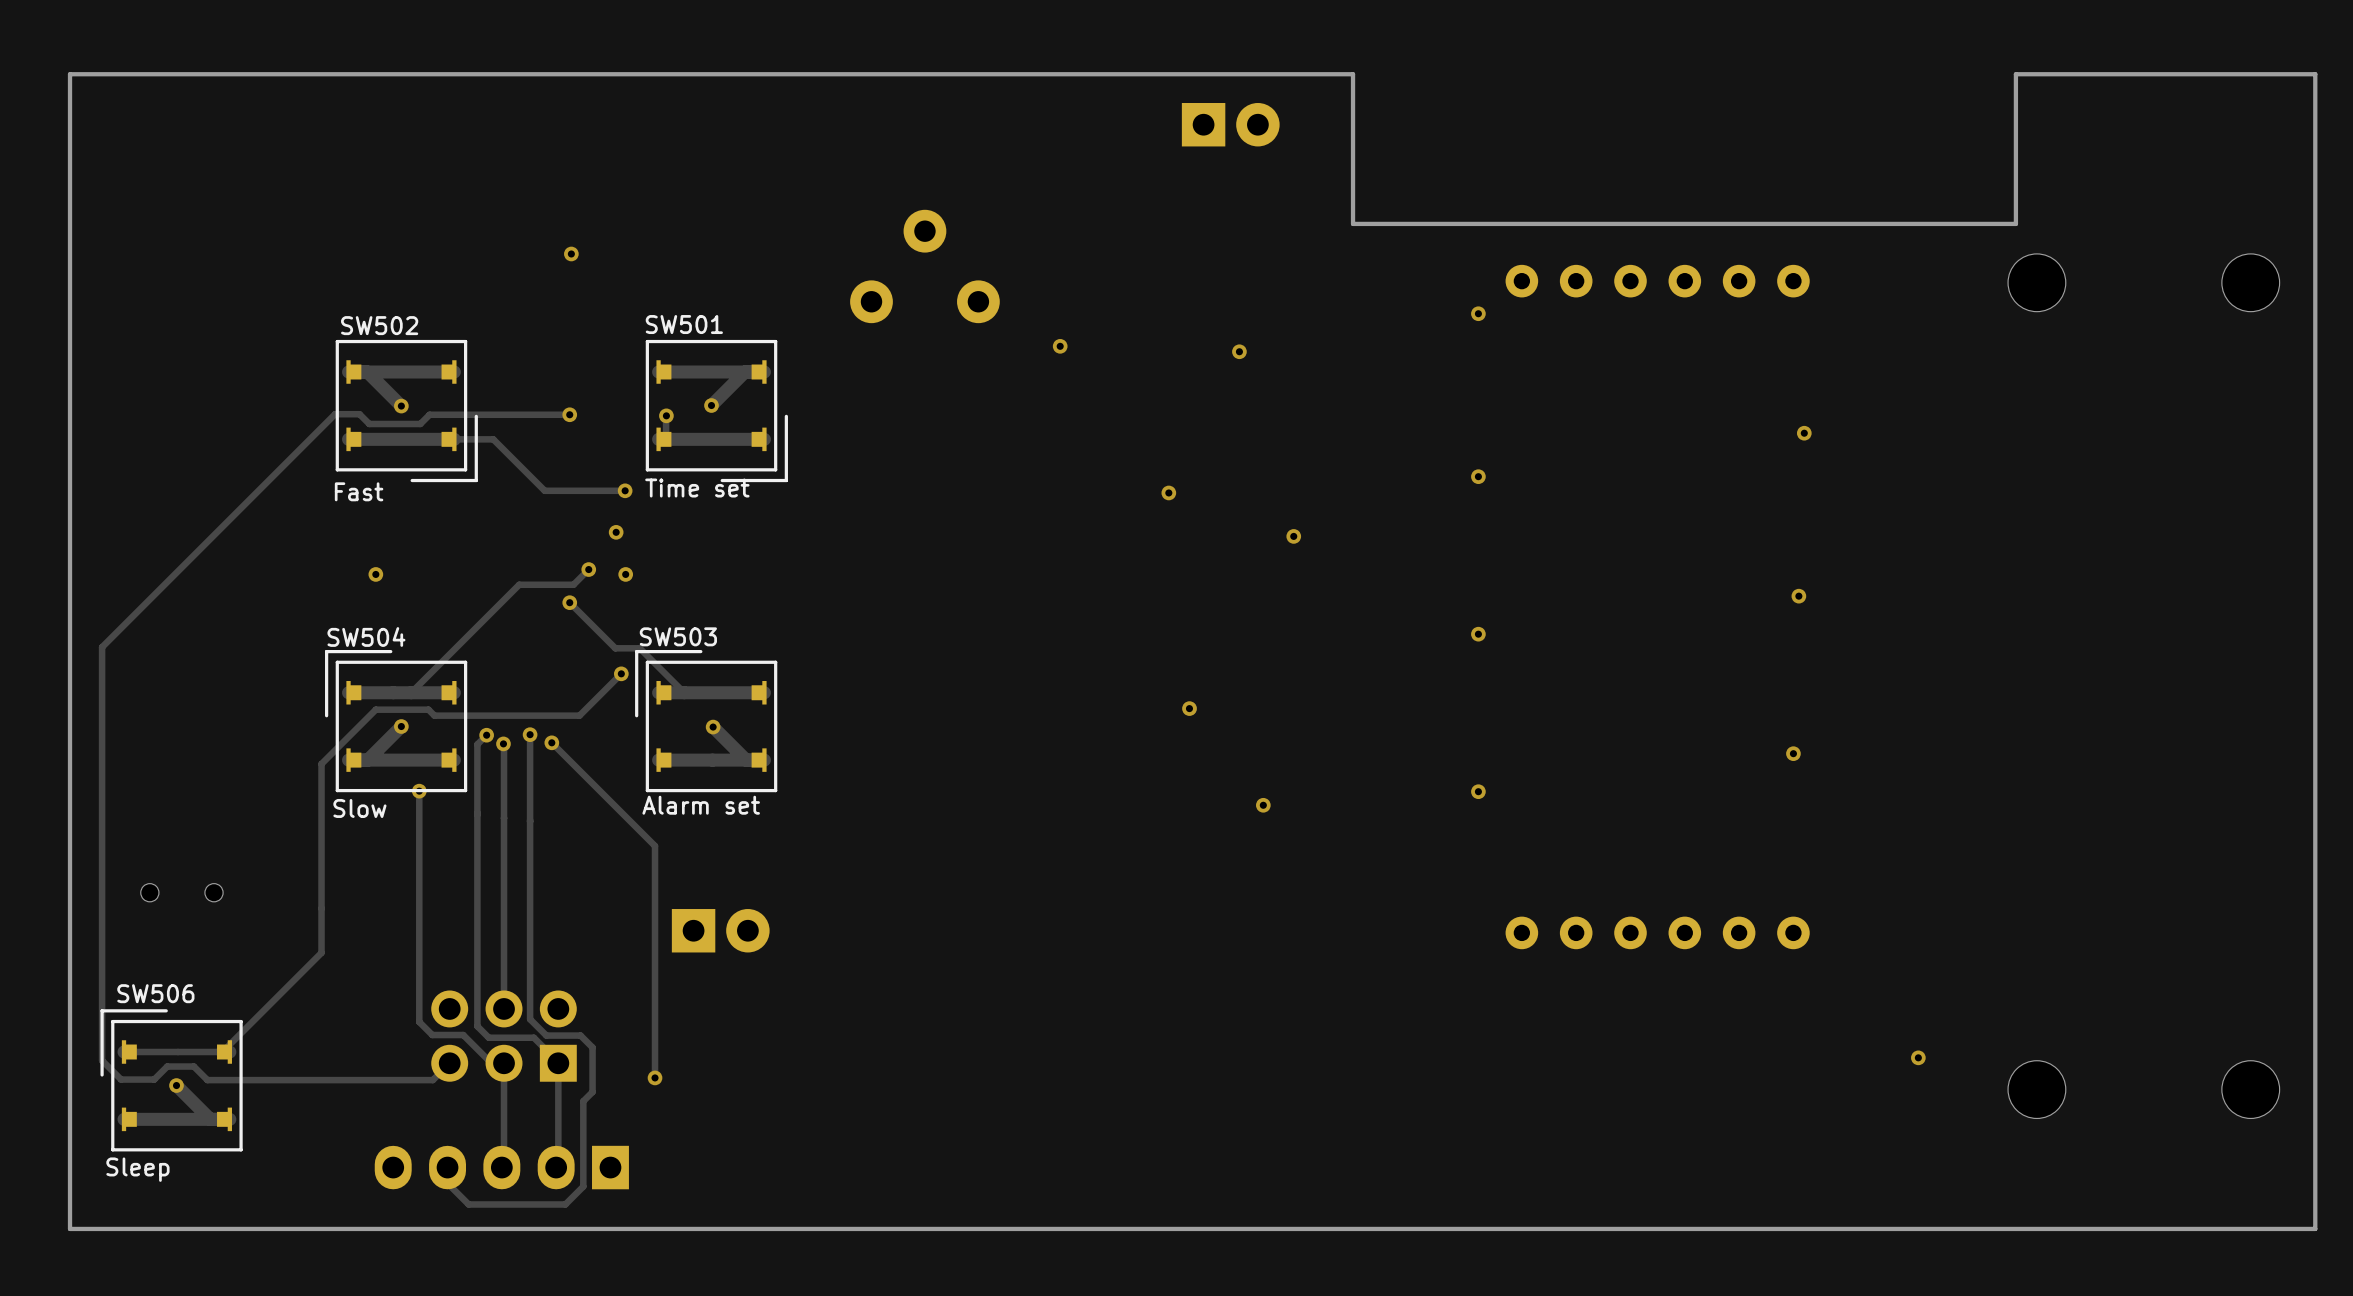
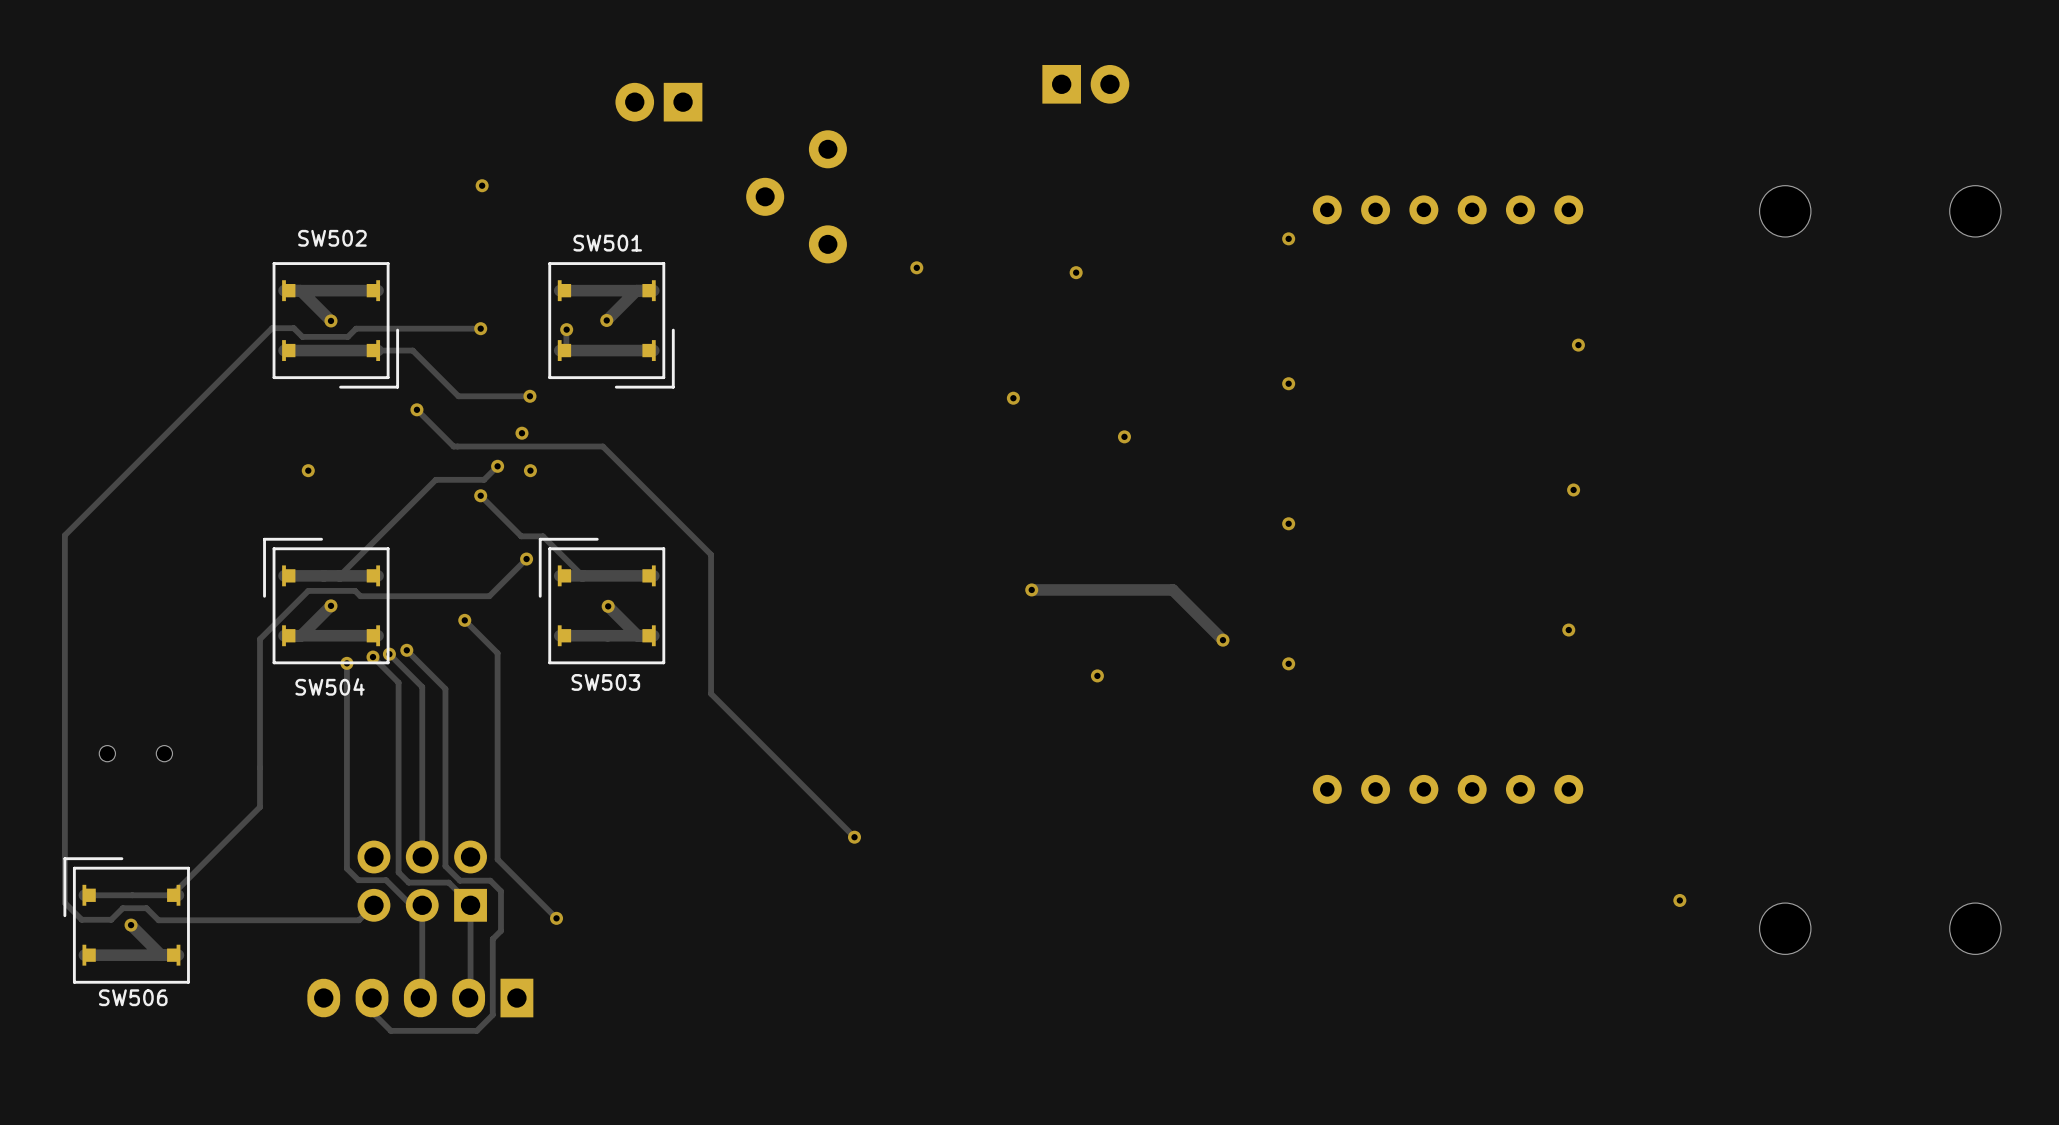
board edge: (2315, 74) (2015, 74) (2015, 223) (1353, 223) (1353, 74) (70, 74) (70, 1228) (2315, 1228) (2315, 74) -> none
part position: (1230, 124) -> (1085, 84)
part: none -> (658, 102)
part rotation: 0° (924, 266) -> 90° counterclockwise (796, 196)
SW501 name position: SW501 (684, 324) -> SW501 (607, 243)
SW502 name position: SW502 (379, 325) -> SW502 (332, 238)
text: Time set (697, 488) -> none
text: Fast (359, 491) -> none
track: none -> (416, 409) (453, 446) (602, 446) (711, 554) (711, 693) (854, 837)
via: none -> (416, 409)
SW504 name position: SW504 (366, 636) -> SW504 (330, 686)
SW503 name position: SW503 (678, 636) -> SW503 (605, 682)
track: none -> (1032, 589) (1172, 589) (1222, 640)
track: (530, 734) (530, 819) -> (406, 650) (445, 688)
via: (530, 734) -> none
track: (486, 735) (477, 744) (477, 812) -> (373, 657) (398, 682)
via: (486, 735) -> none
track: (503, 743) (504, 817) -> (389, 654) (422, 687)
via: (503, 743) -> none
via: none -> (1222, 640)
via: none -> (406, 650)
track: (588, 779) (655, 846) (655, 1077) -> (497, 653) (497, 859) (556, 918)
via: none -> (389, 654)
via: none -> (373, 657)
text: Alarm set (701, 805) -> none
text: Slow (359, 808) -> none
part: (720, 930) -> none
via: none -> (854, 837)
SW506 name position: SW506 (155, 993) -> SW506 (133, 997)
text: Sleep (137, 1169) -> none

